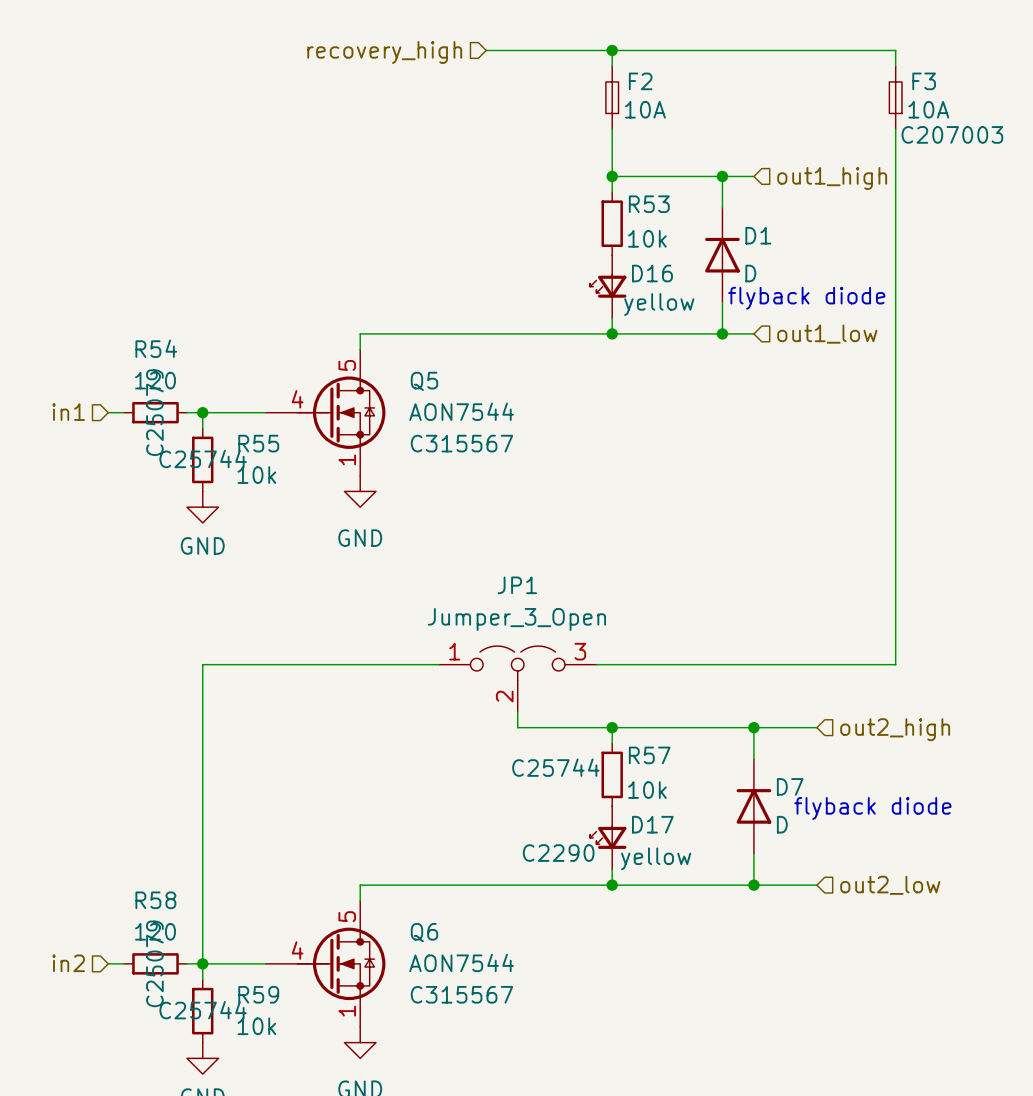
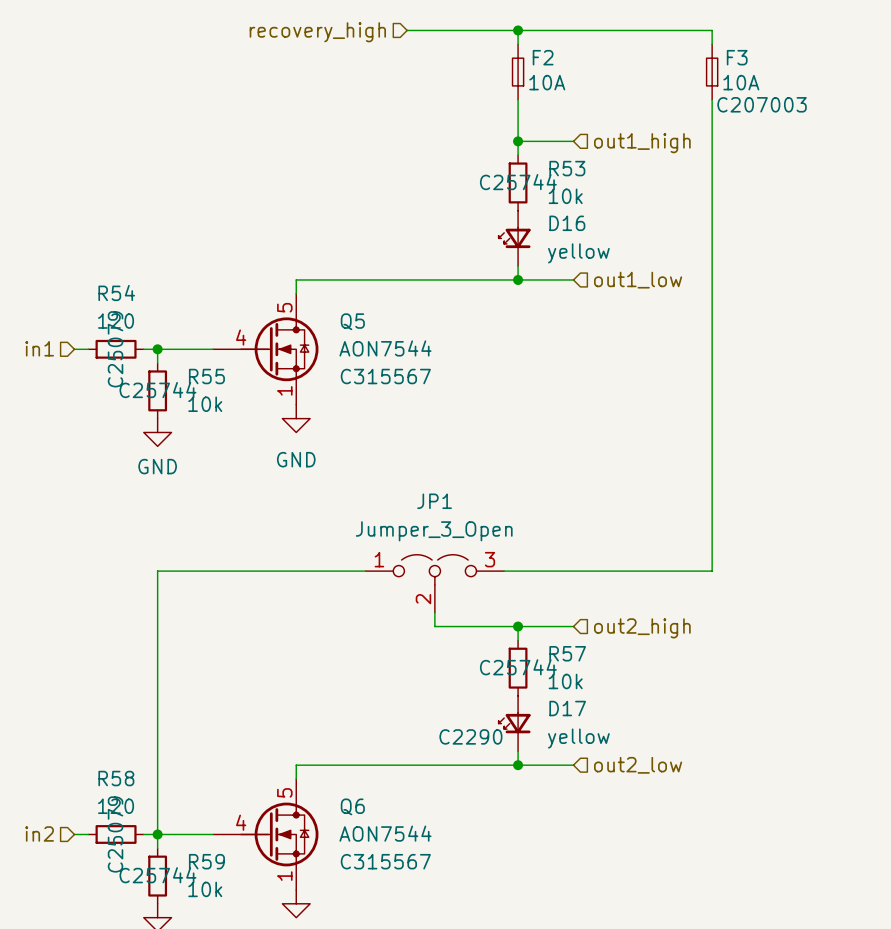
wire: (832, 50) (895, 50) (895, 66) -> (712, 30) (712, 44)
F3 position: (895, 97) -> (712, 72)
wire: (895, 129) (895, 664) (832, 664) -> (712, 99) (712, 571)
wire: (675, 176) (753, 176) -> none
wire: (722, 176) (722, 207) -> none
junction: (722, 176) -> none
hierarchical label position: out1_high (832, 178) -> out1_high (642, 143)
R53 name position: R53 (649, 204) -> R53 (567, 168)
R53 text: none -> C25744 (518, 182)
R53 value position: 10k (647, 238) -> 10k (565, 196)
D1: D (722, 255) -> none
D16 name position: D16 (652, 273) -> D16 (567, 223)
text: flyback diode (806, 298) -> none
wire: (722, 302) (722, 333) -> none
D16 value position: yellow (659, 304) -> yellow (578, 253)
wire: (675, 333) (753, 333) -> none
junction: (722, 333) -> none
hierarchical label position: out1_low (827, 334) -> out1_low (638, 280)
wire: (675, 727) (816, 727) -> none
wire: (753, 727) (753, 759) -> none
junction: (753, 727) -> none
hierarchical label position: out2_high (895, 729) -> out2_high (642, 628)
R57 name position: R57 (649, 755) -> R57 (567, 653)
R57 text position: C25744 (555, 767) -> C25744 (518, 667)
R57 value position: 10k (647, 790) -> 10k (565, 681)
D7: D (753, 806) -> none
text: flyback diode (872, 808) -> none
D17 name position: D17 (652, 824) -> D17 (567, 708)
wire: (753, 853) (753, 885) -> none
D17 value position: yellow (656, 858) -> yellow (578, 738)
wire: (675, 885) (816, 885) -> none
junction: (753, 885) -> none
hierarchical label position: out2_low (890, 885) -> out2_low (638, 765)

